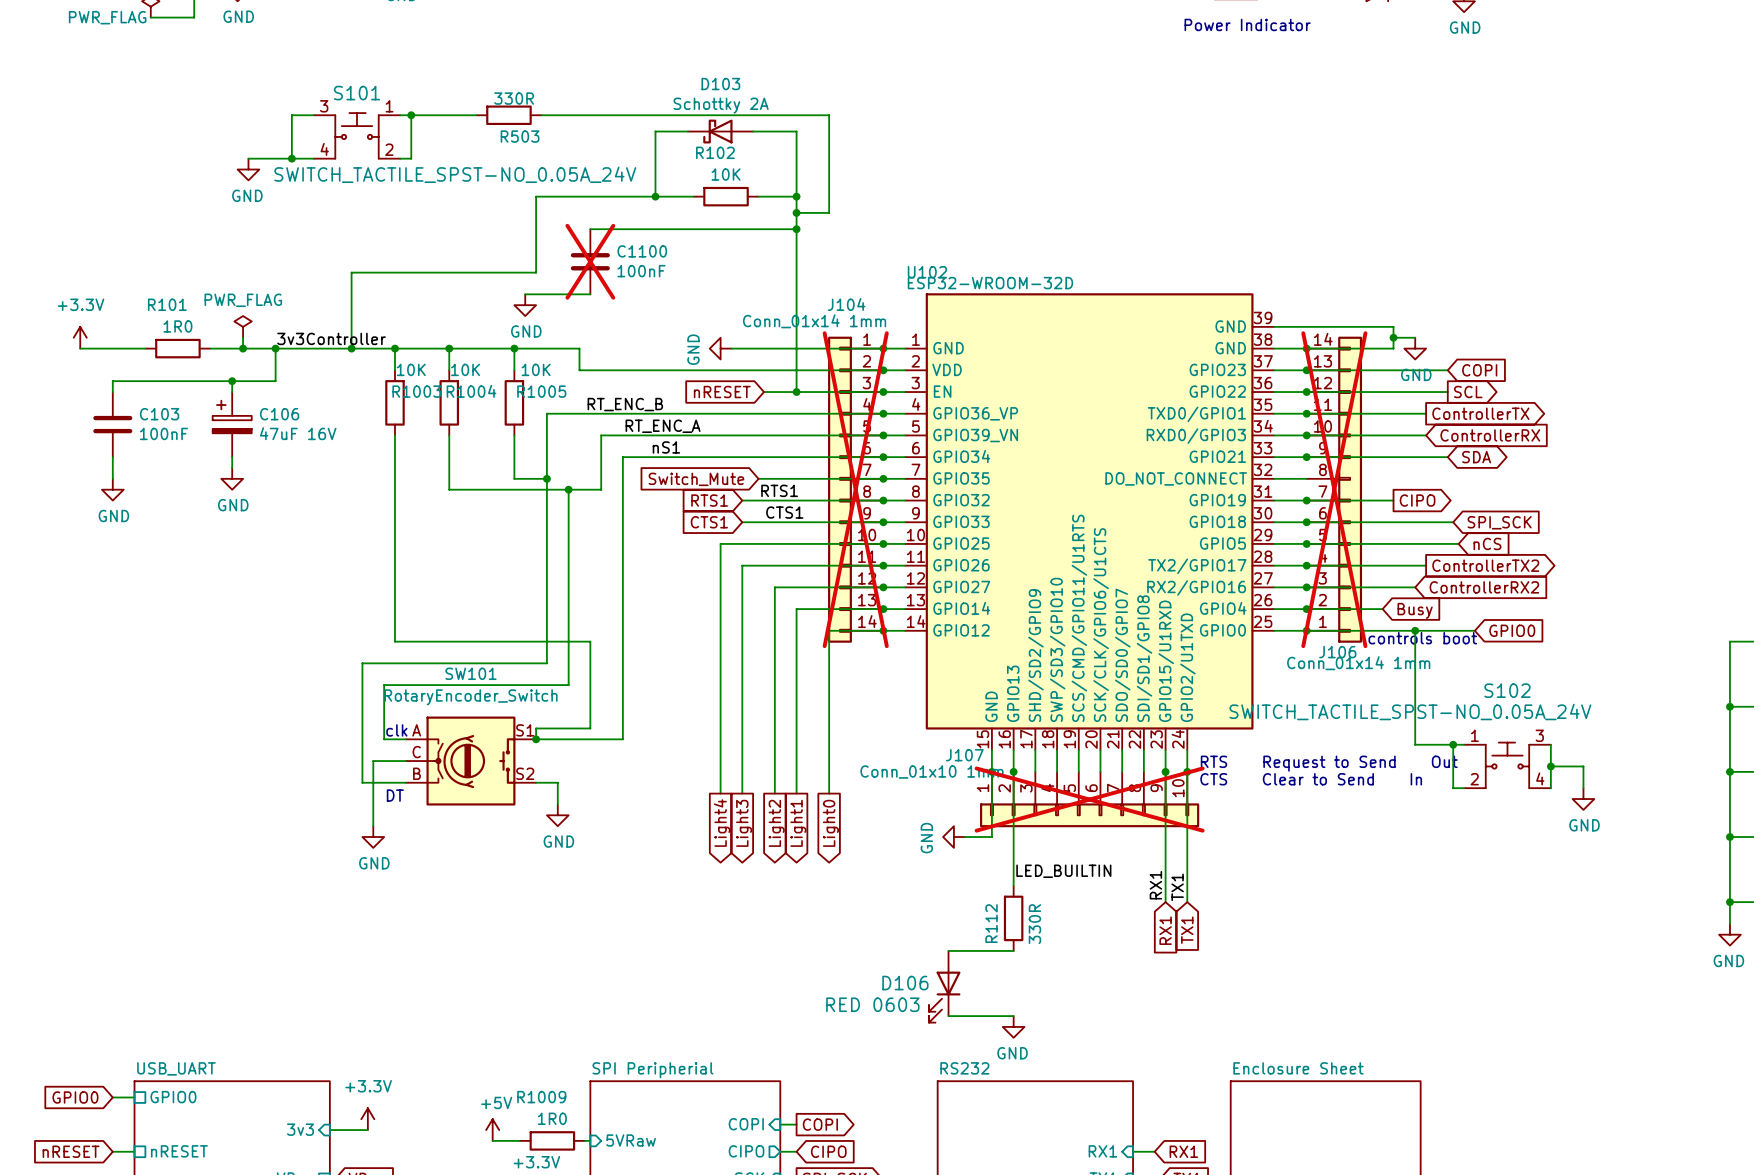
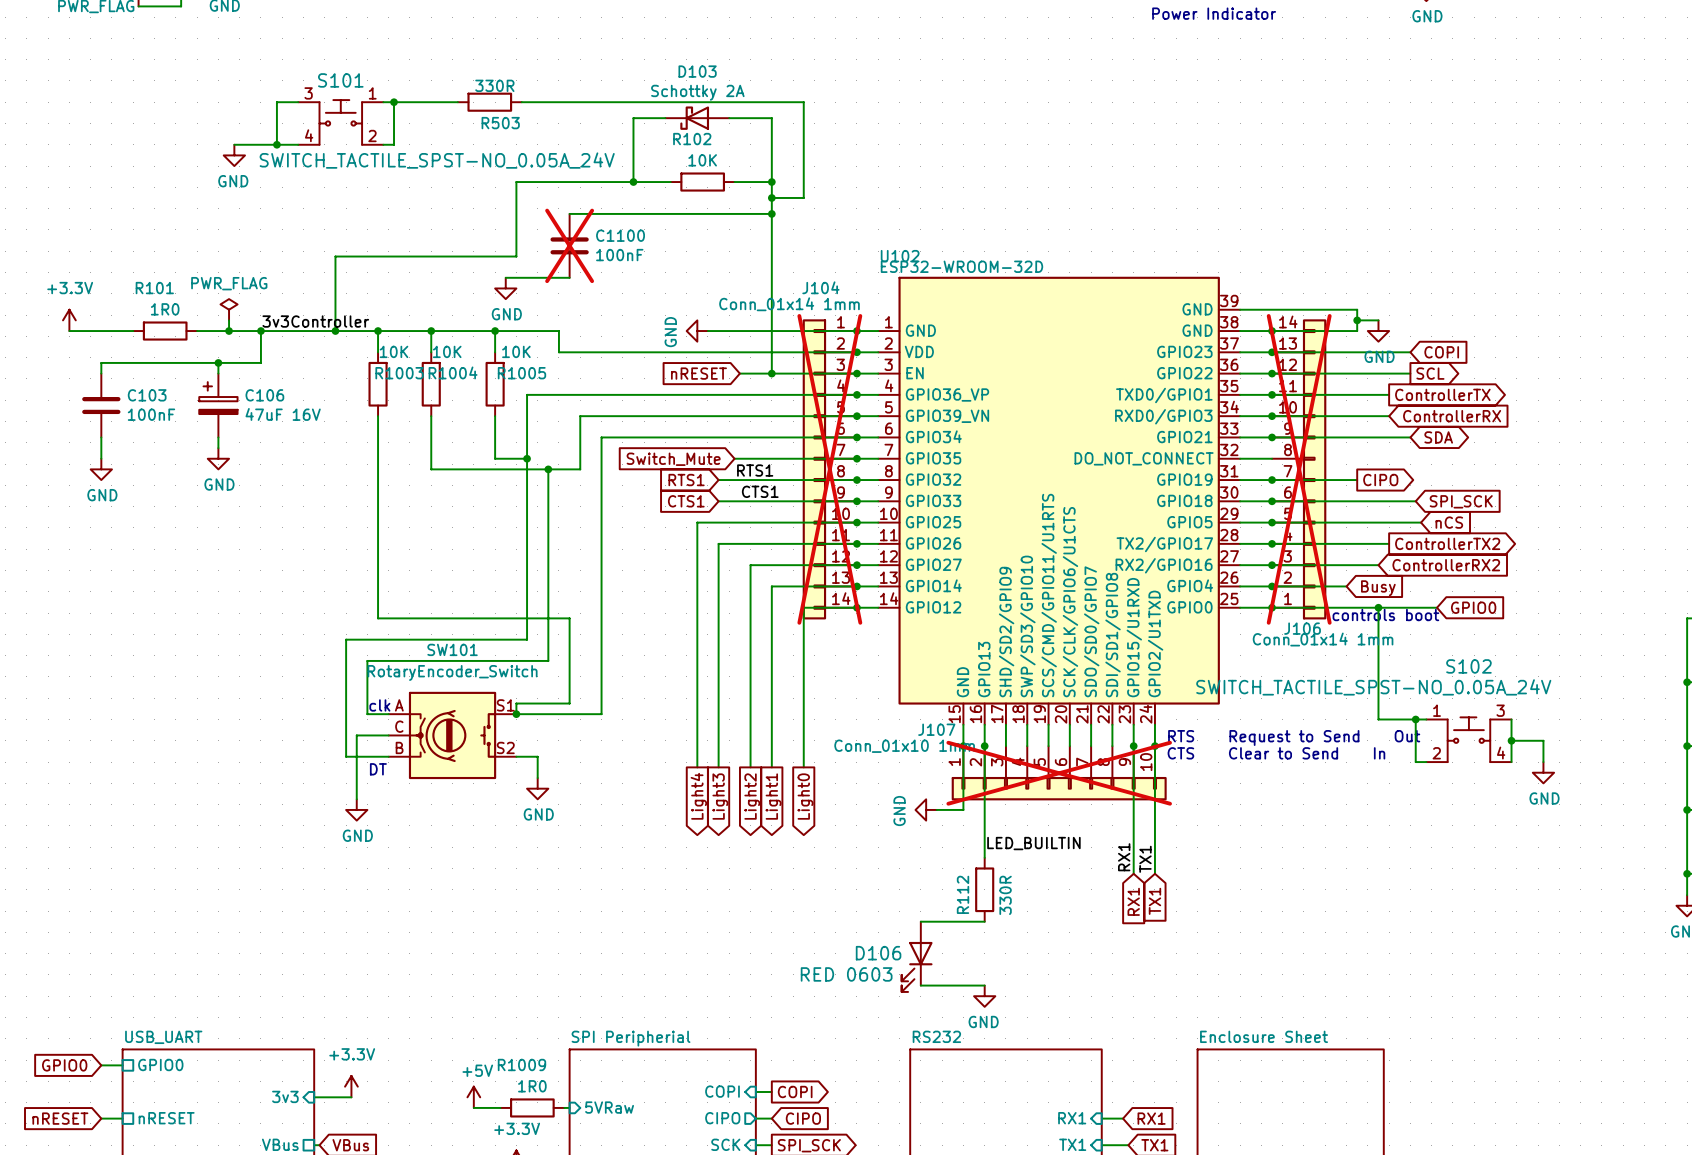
label: RT_ENC_B (625, 404) -> none
label: RT_ENC_A (663, 426) -> none
label: nS1 (666, 447) -> none

